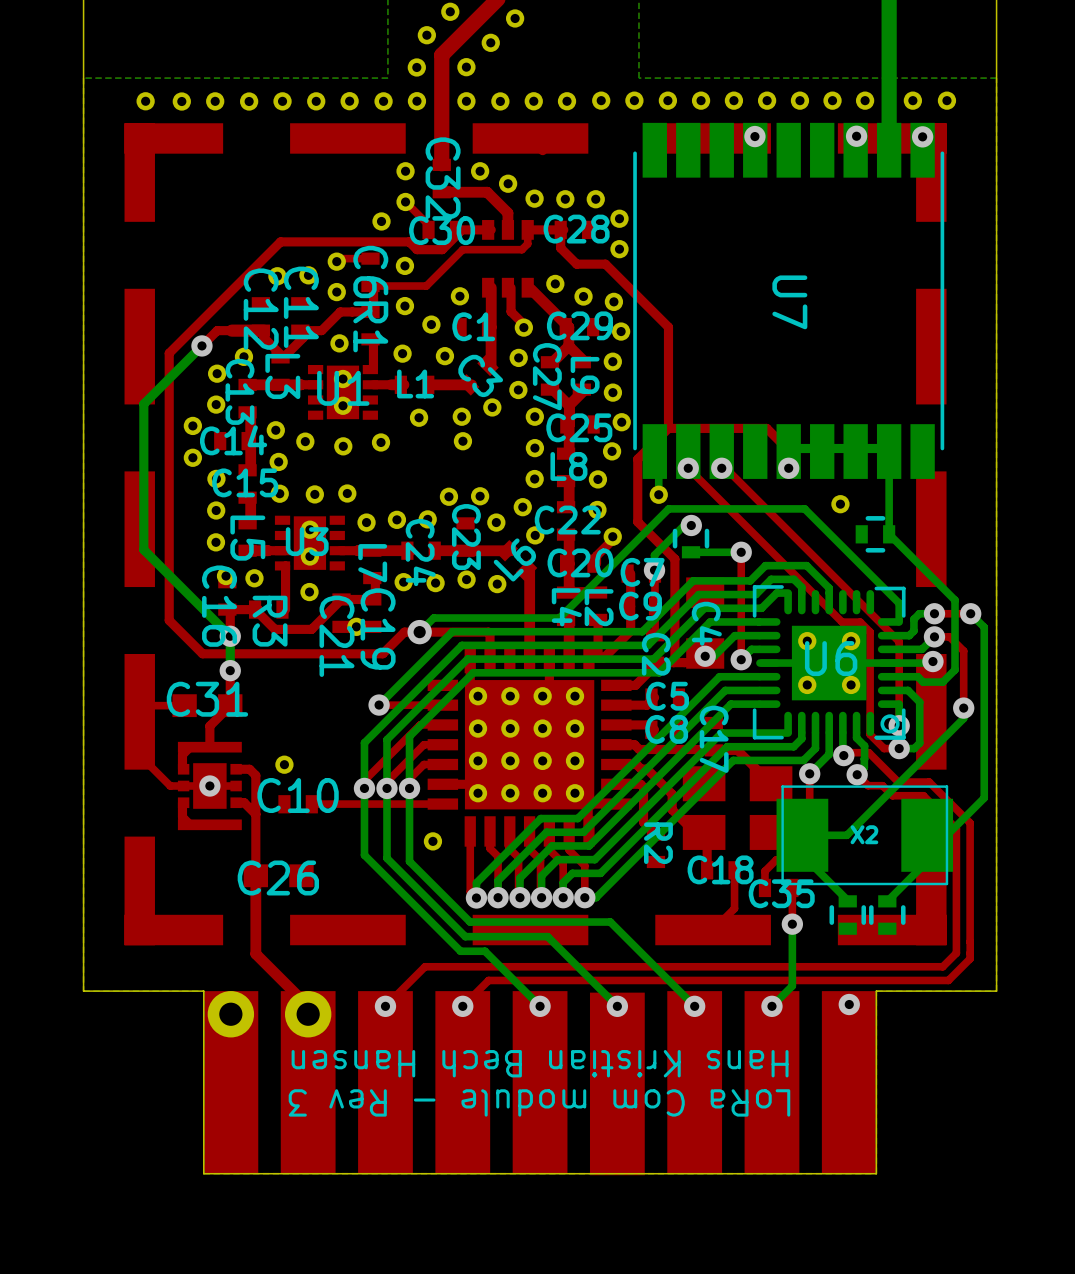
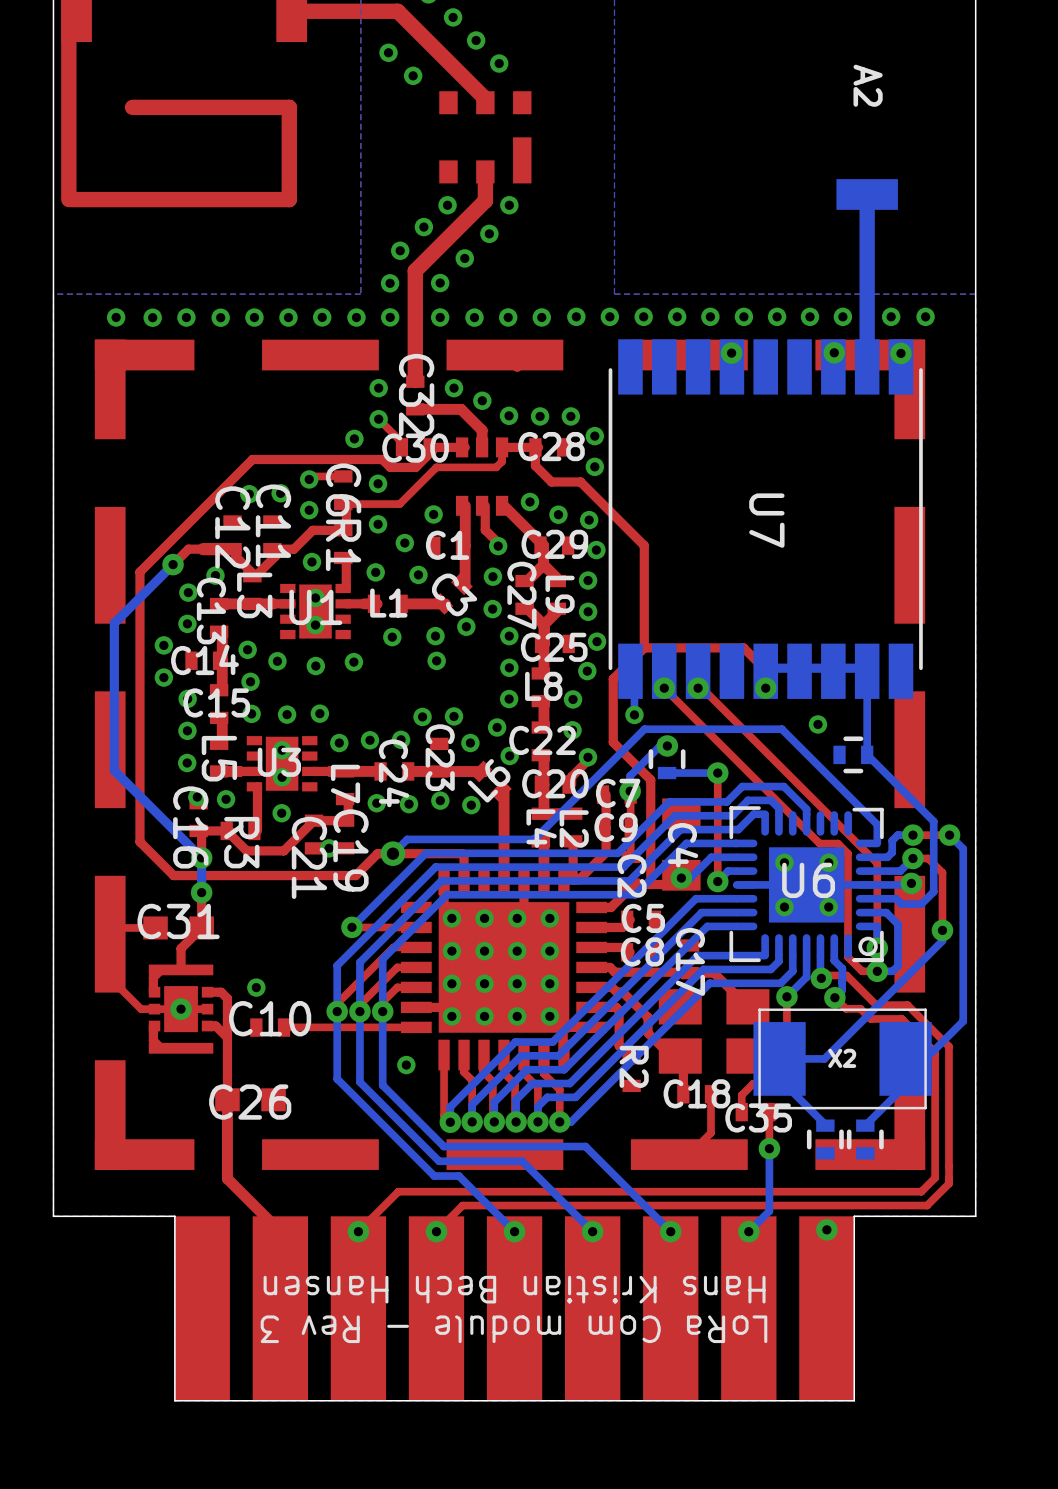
part footprint: [203, 991, 877, 1176] -> [174, 1216, 855, 1401]

